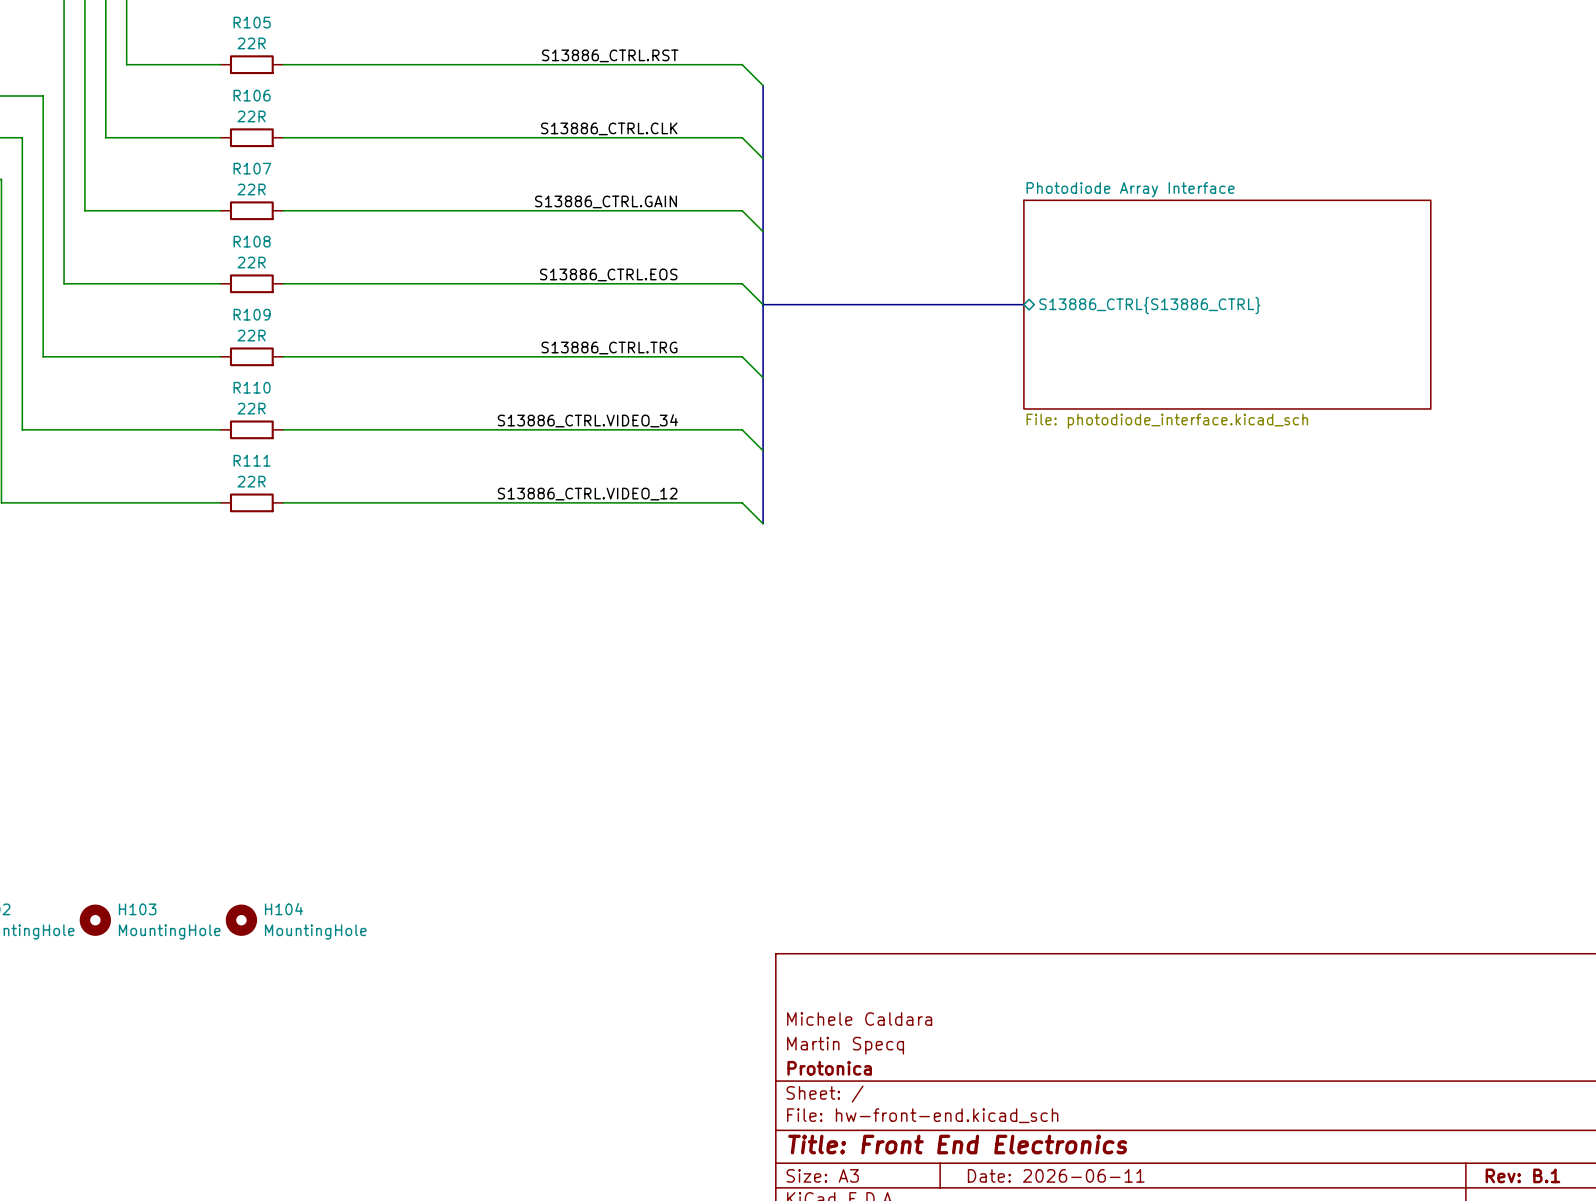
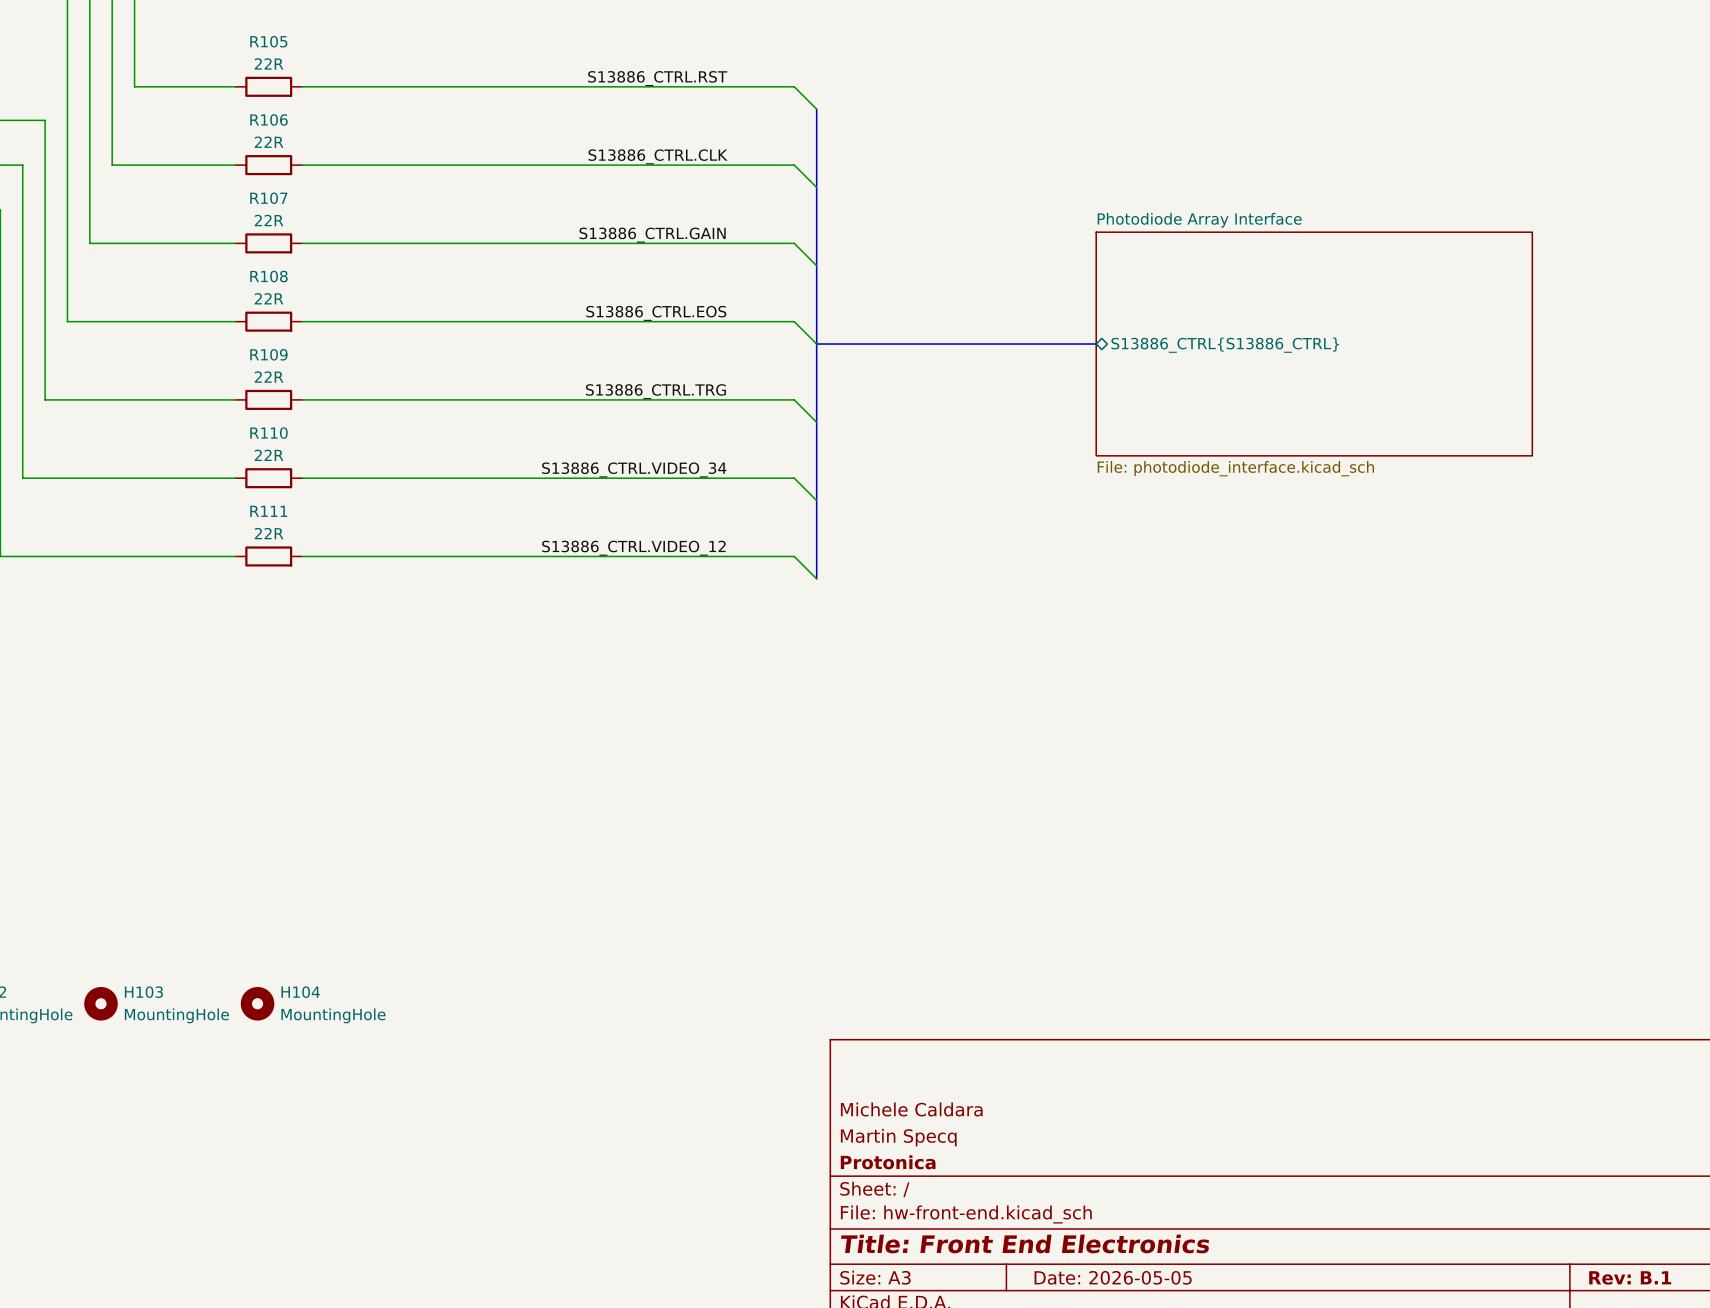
title block: Date: 2026-06-11 (1056, 1175) -> Date: 2026-05-05 (1113, 1277)

